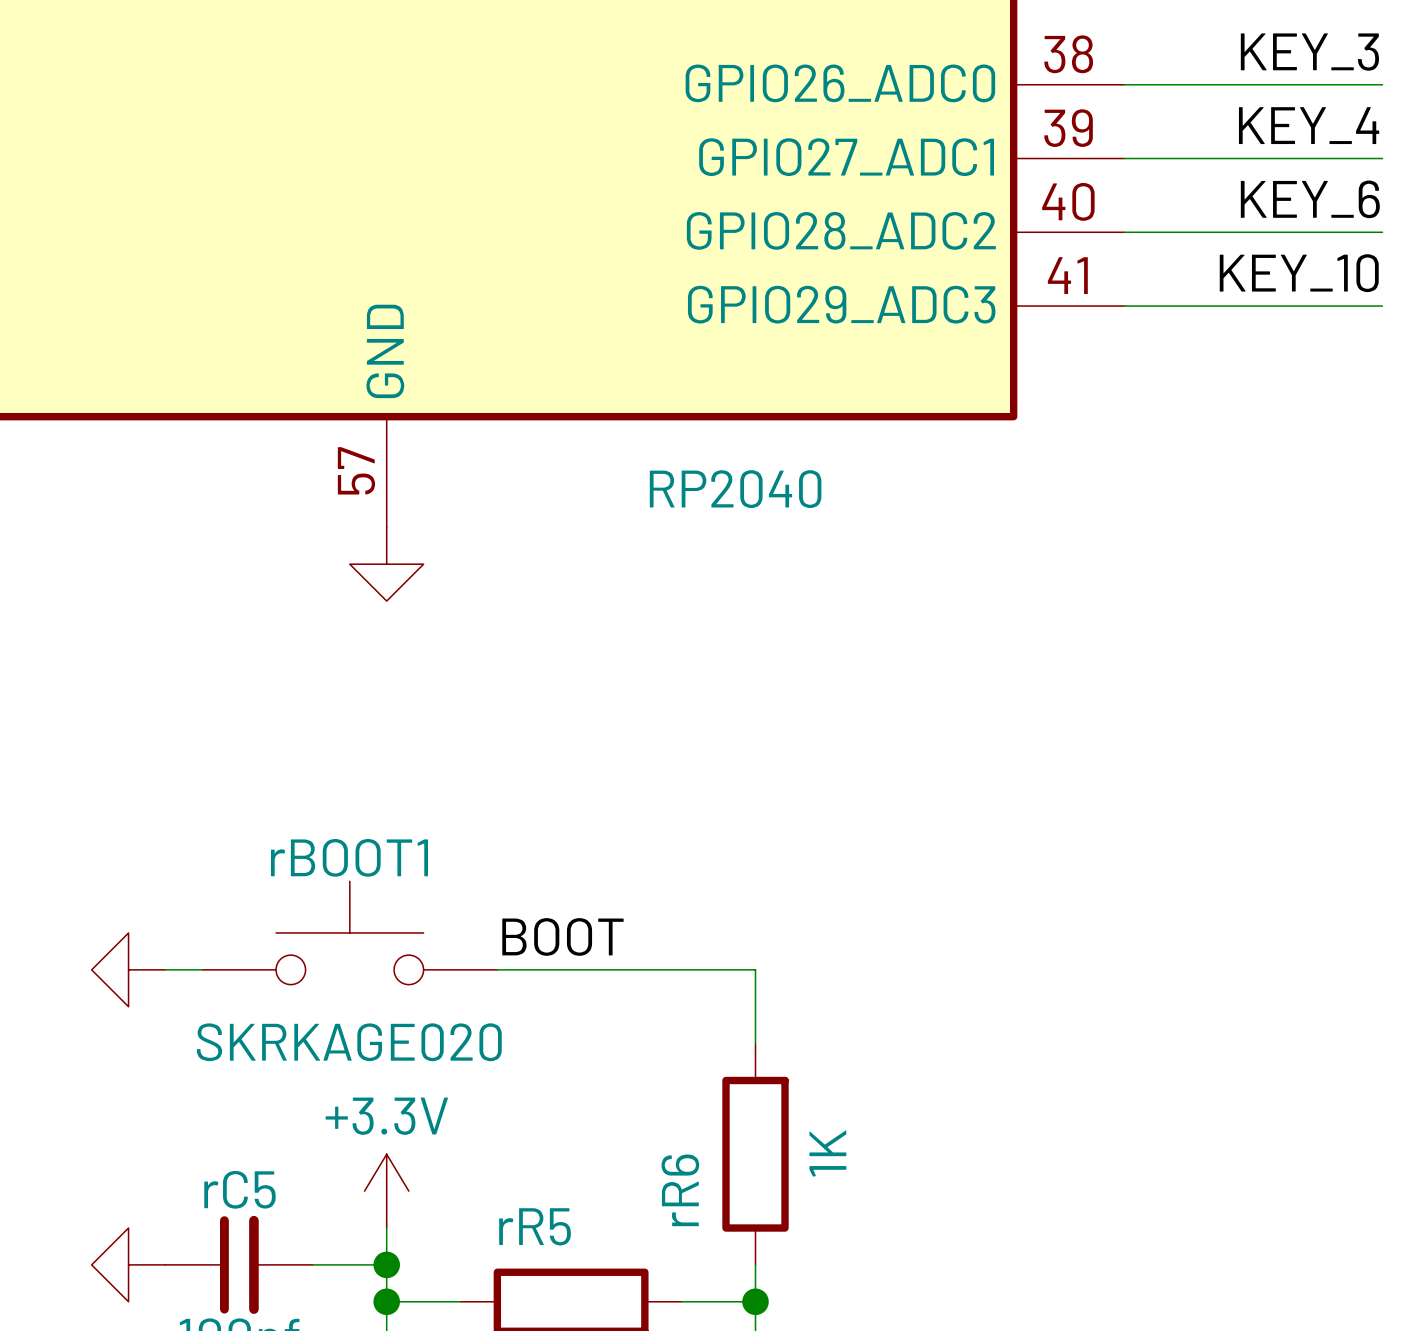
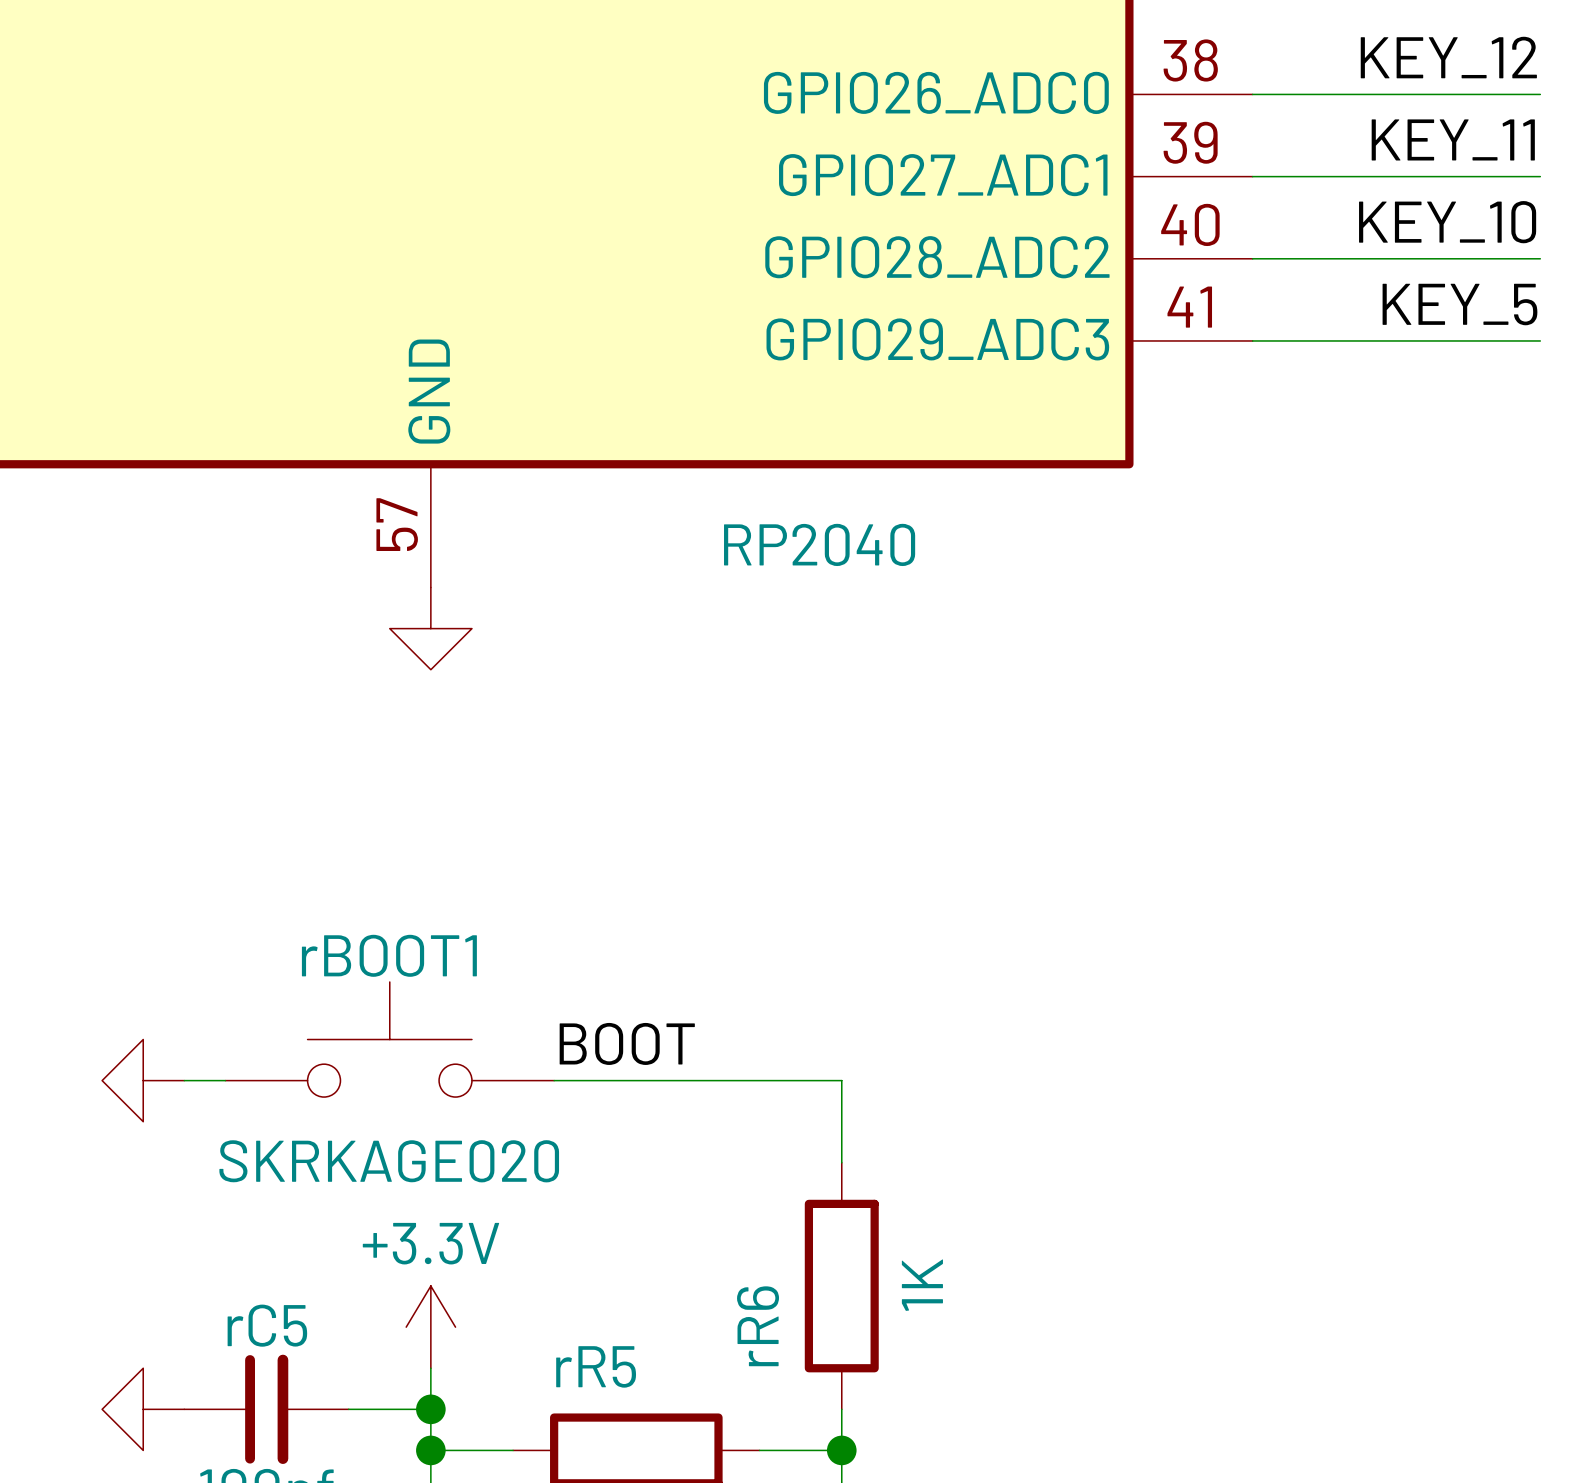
label: KEY_3 (1309, 52) -> KEY_12 (1448, 57)
label: KEY_4 (1309, 125) -> KEY_11 (1453, 139)
label: KEY_6 (1310, 199) -> KEY_10 (1447, 222)
label: KEY_10 (1299, 273) -> KEY_5 (1459, 304)

